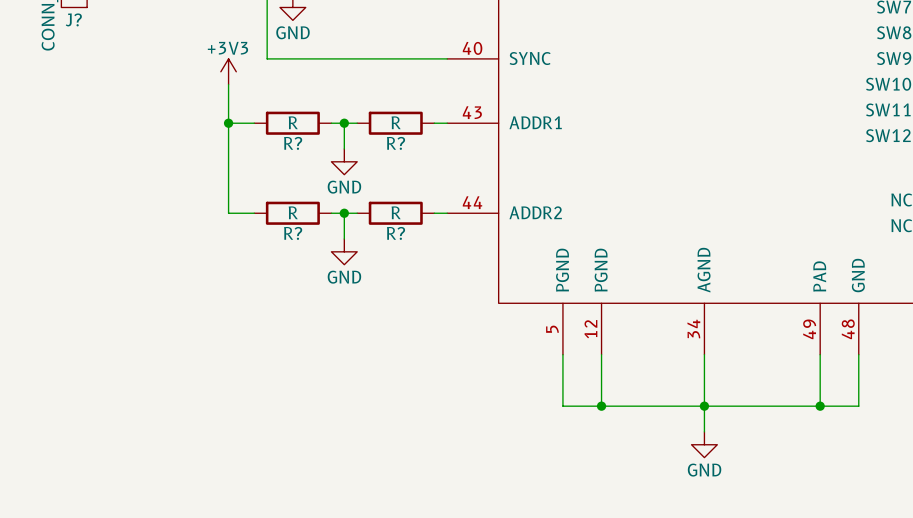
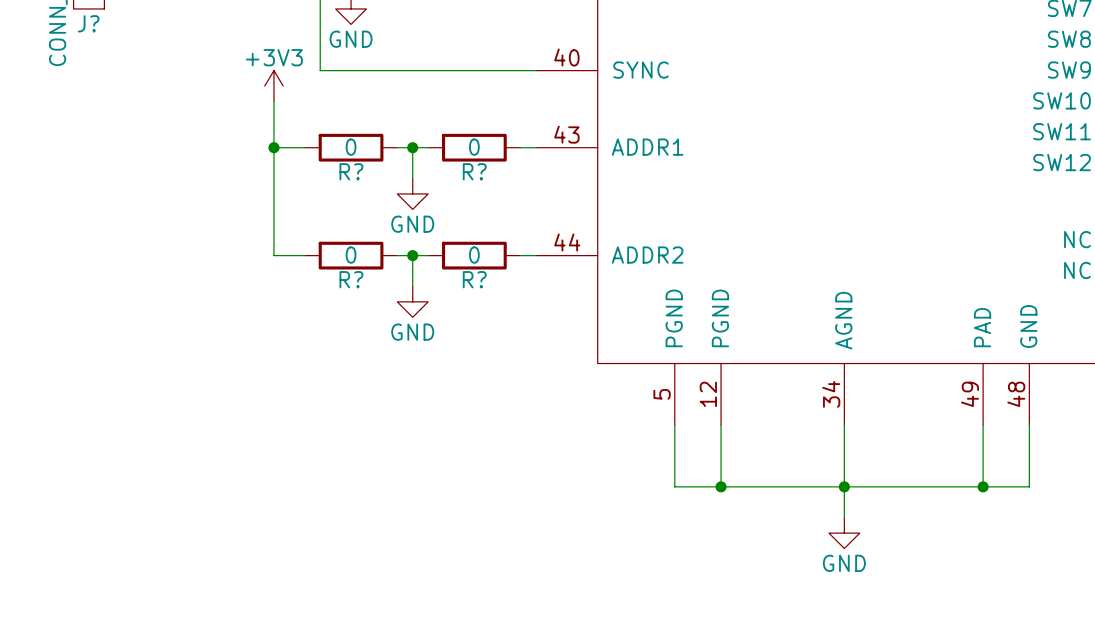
R? value: R (293, 122) -> 0 (351, 147)
R? value: R (396, 122) -> 0 (474, 147)
R? value: R (293, 212) -> 0 (351, 255)
R? value: R (396, 212) -> 0 (474, 255)

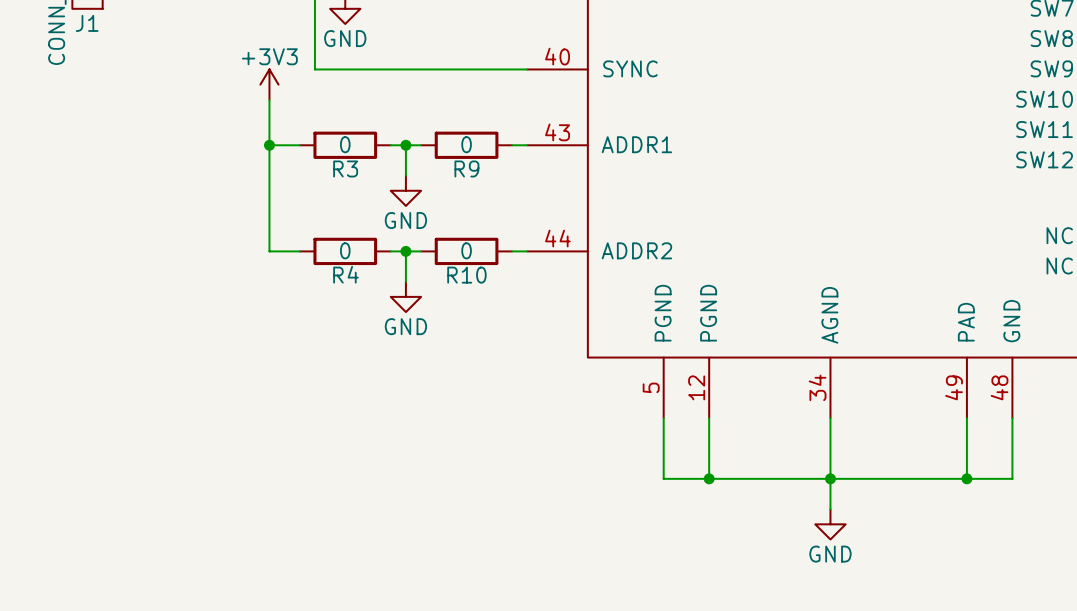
J? name: J? (88, 23) -> J1 (87, 23)
R? name: R? (351, 171) -> R3 (345, 168)
R? name: R? (474, 171) -> R9 (466, 168)
R? name: R? (351, 279) -> R4 (346, 274)
R? name: R? (474, 279) -> R10 (466, 275)

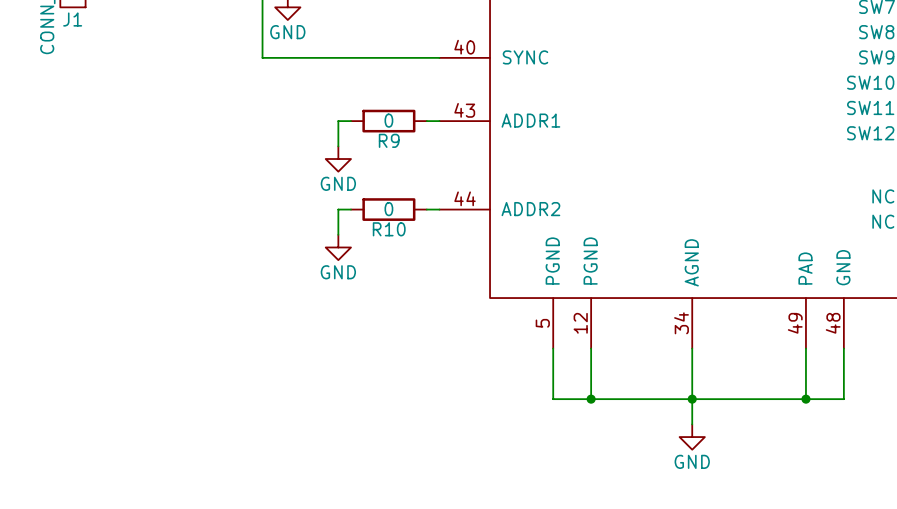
power symbol: +3V3 (269, 84) -> none
wire: (269, 99) (269, 251) (299, 251) -> none
wire: (269, 145) (299, 145) -> none
junction: (269, 145) -> none
R3: 0 (345, 145) -> none
wire: (390, 145) (405, 145) -> none
junction: (405, 145) -> none
R4: 0 (345, 251) -> none
wire: (390, 251) (405, 251) -> none
junction: (405, 251) -> none

